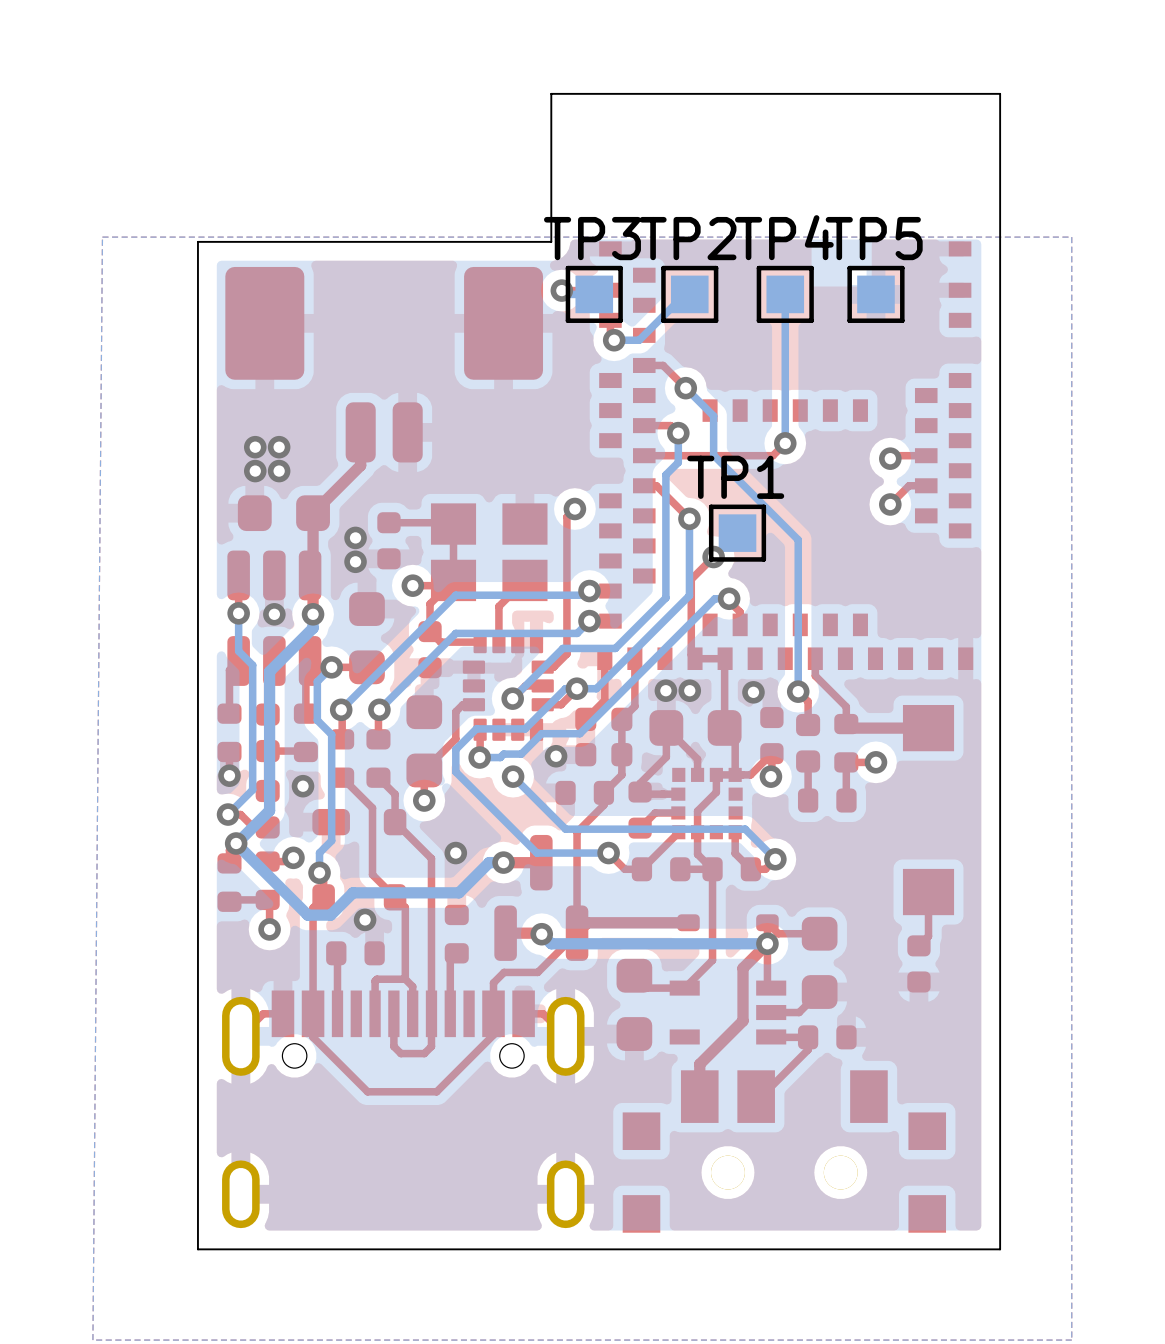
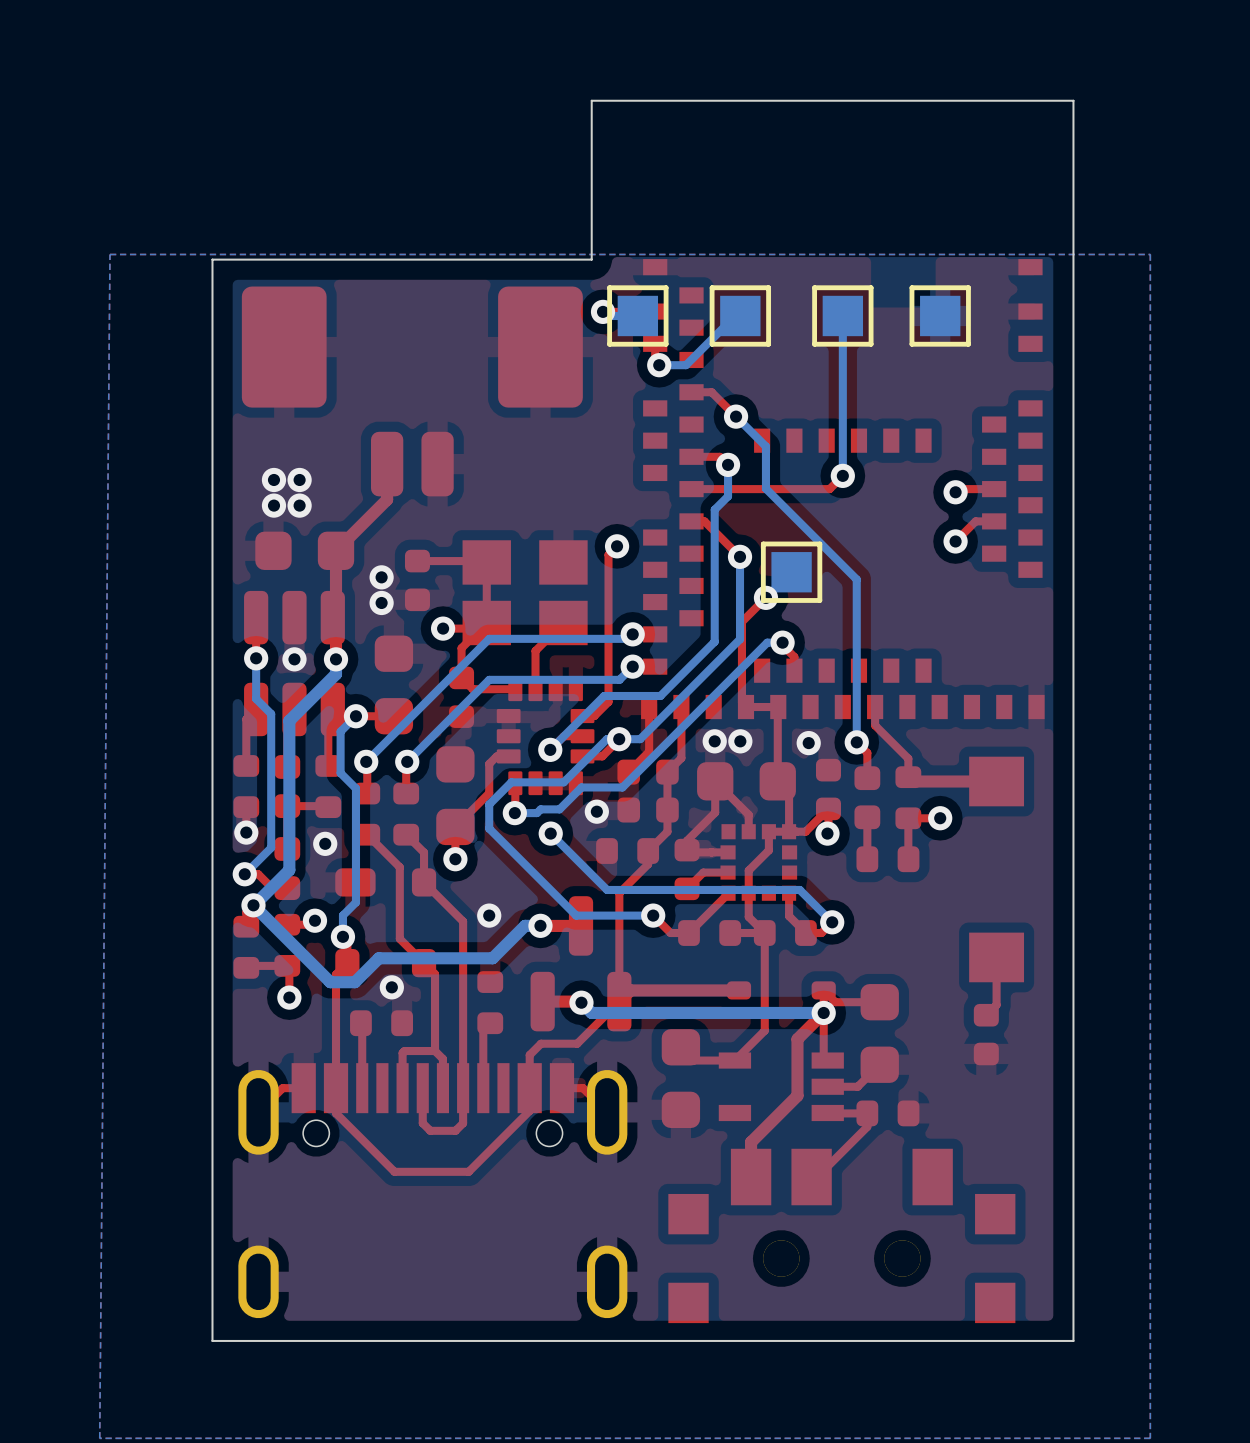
TP4 name: TP4 (784, 237) -> none
TP3 name: TP3 (592, 238) -> none
TP2 name: TP2 (687, 238) -> none
TP5 name: TP5 (874, 238) -> none
TP1 name: TP1 (735, 477) -> none

